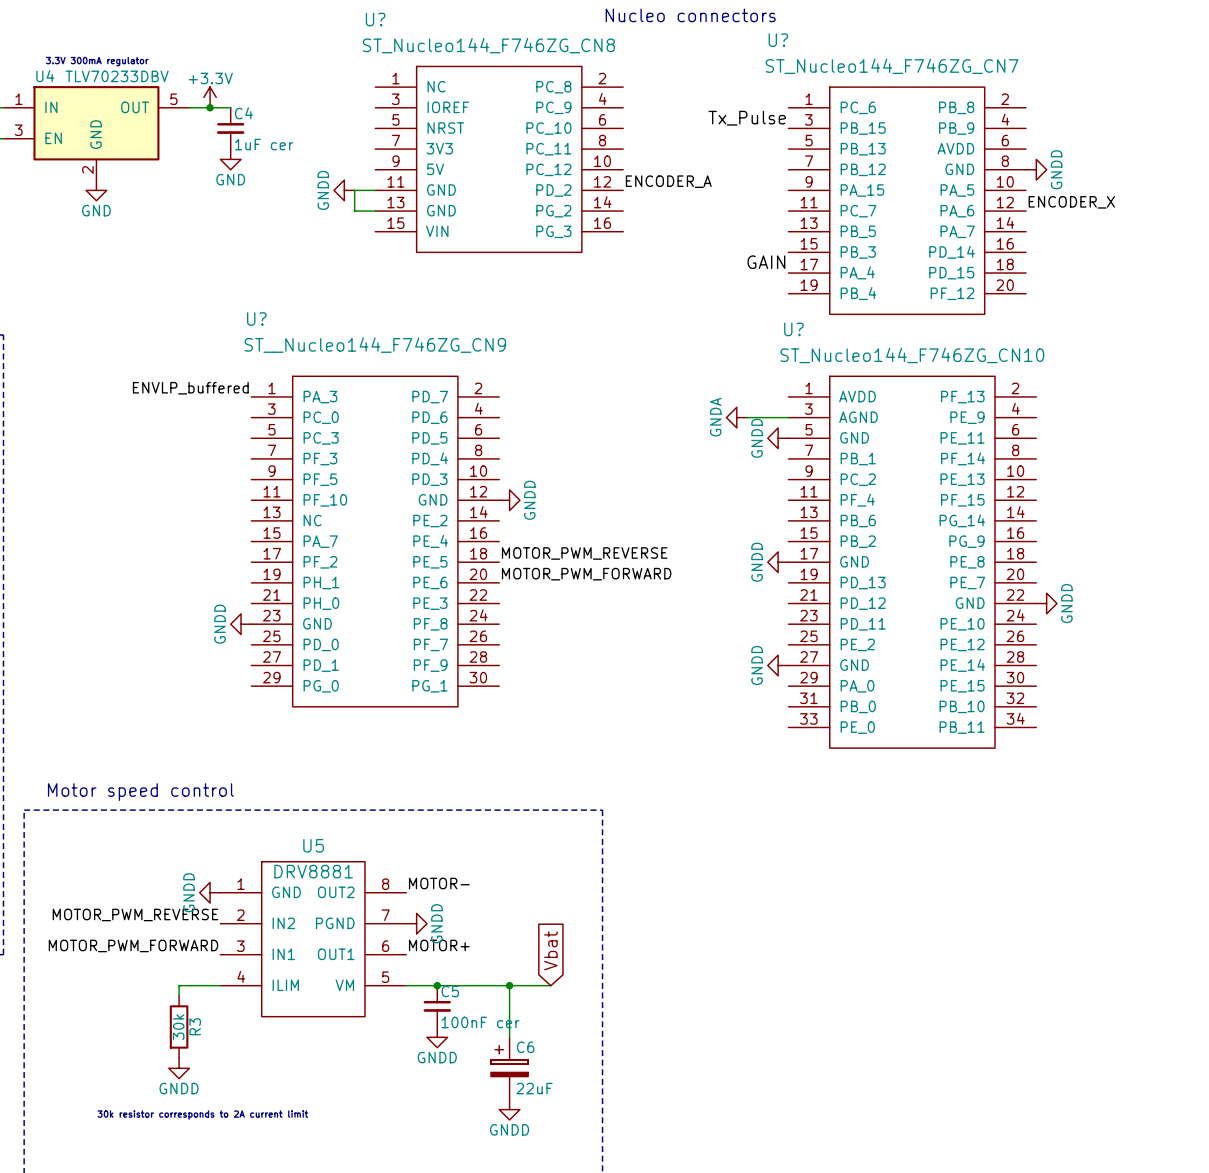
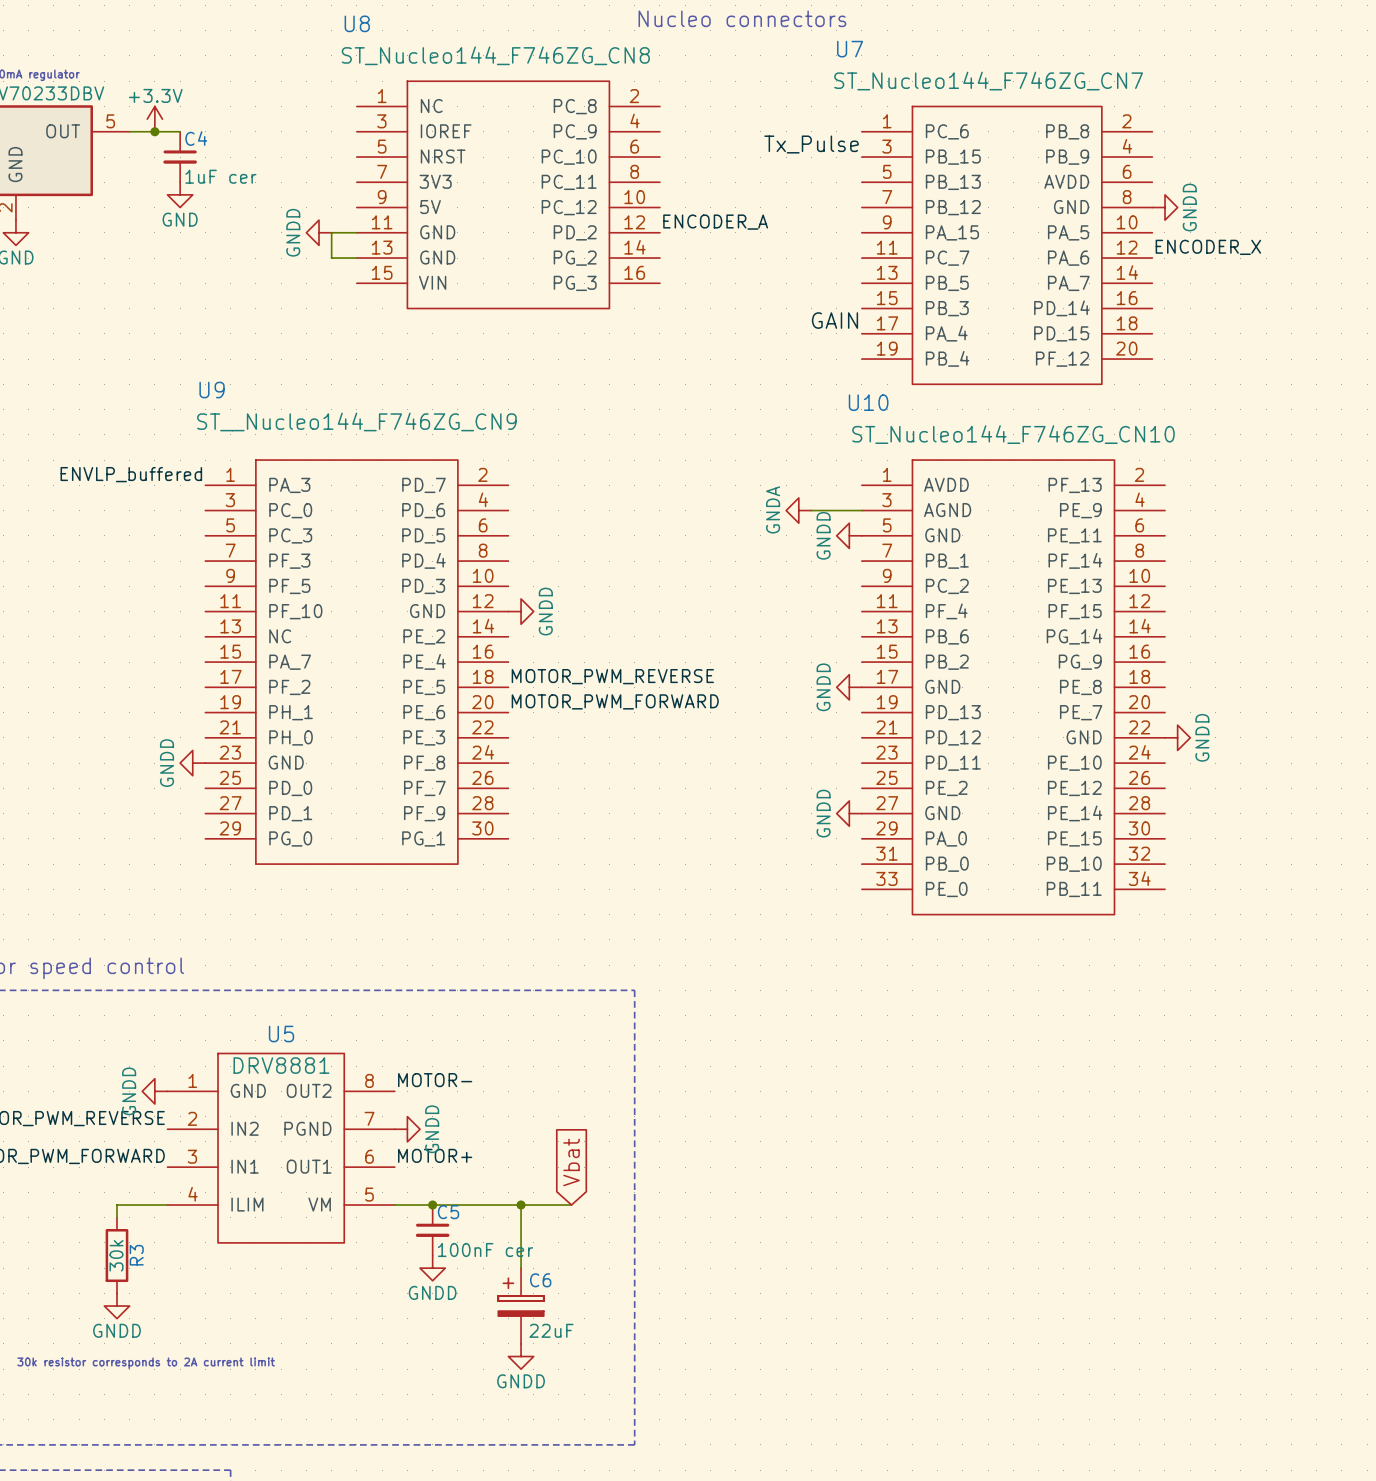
U? name: U? (375, 19) -> U8 (357, 23)
U? name: U? (778, 40) -> U7 (850, 49)
U? name: U? (256, 319) -> U9 (212, 390)
U? name: U? (793, 329) -> U10 (868, 402)

